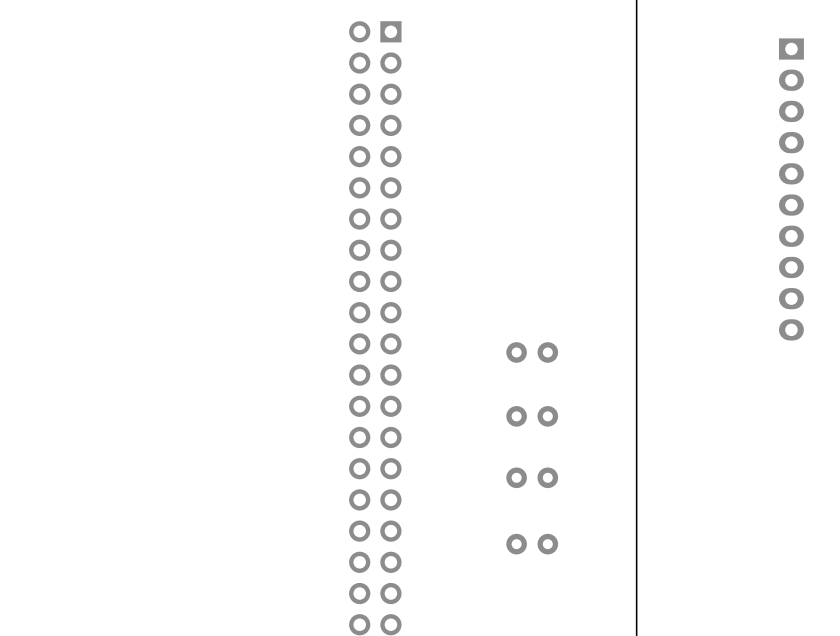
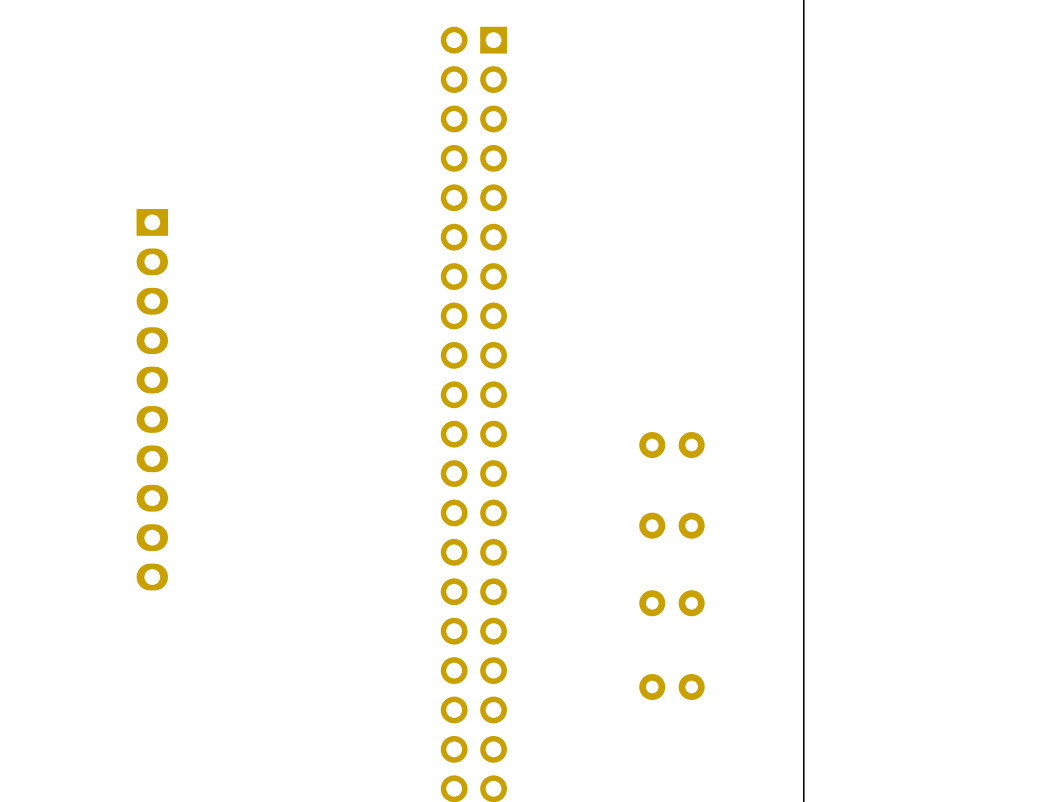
part: (791, 189) -> none
part: none -> (152, 399)

